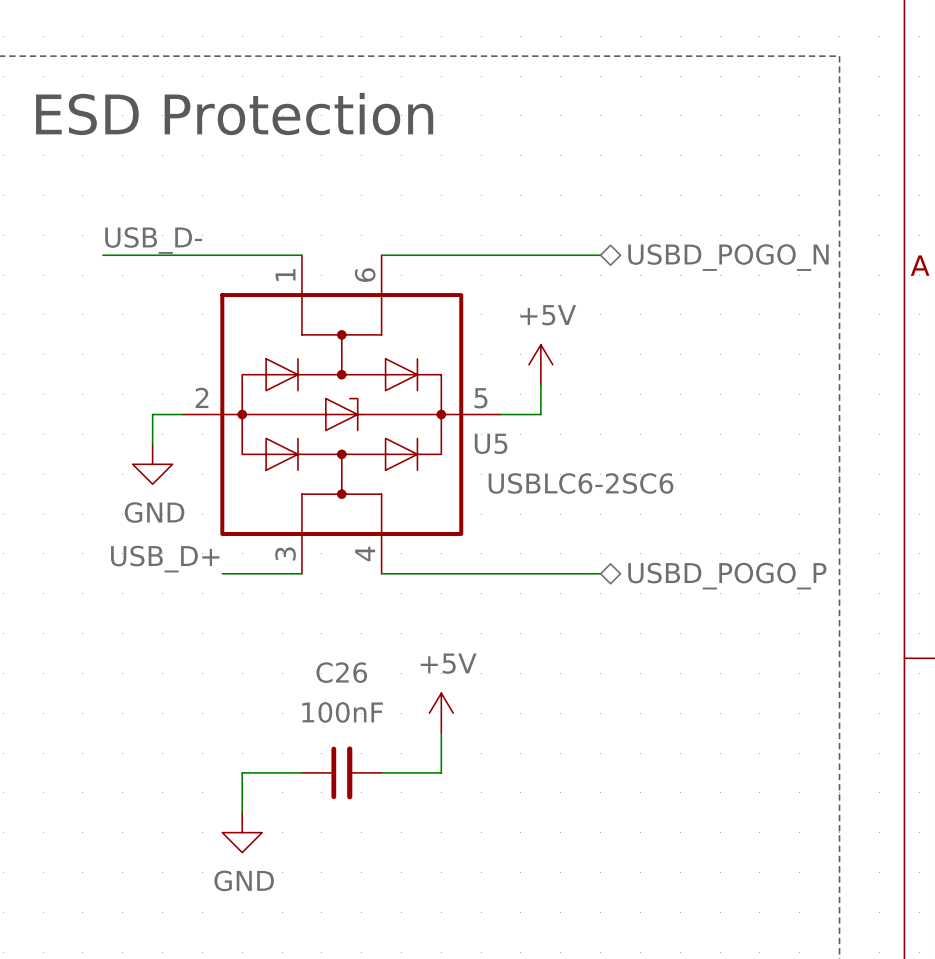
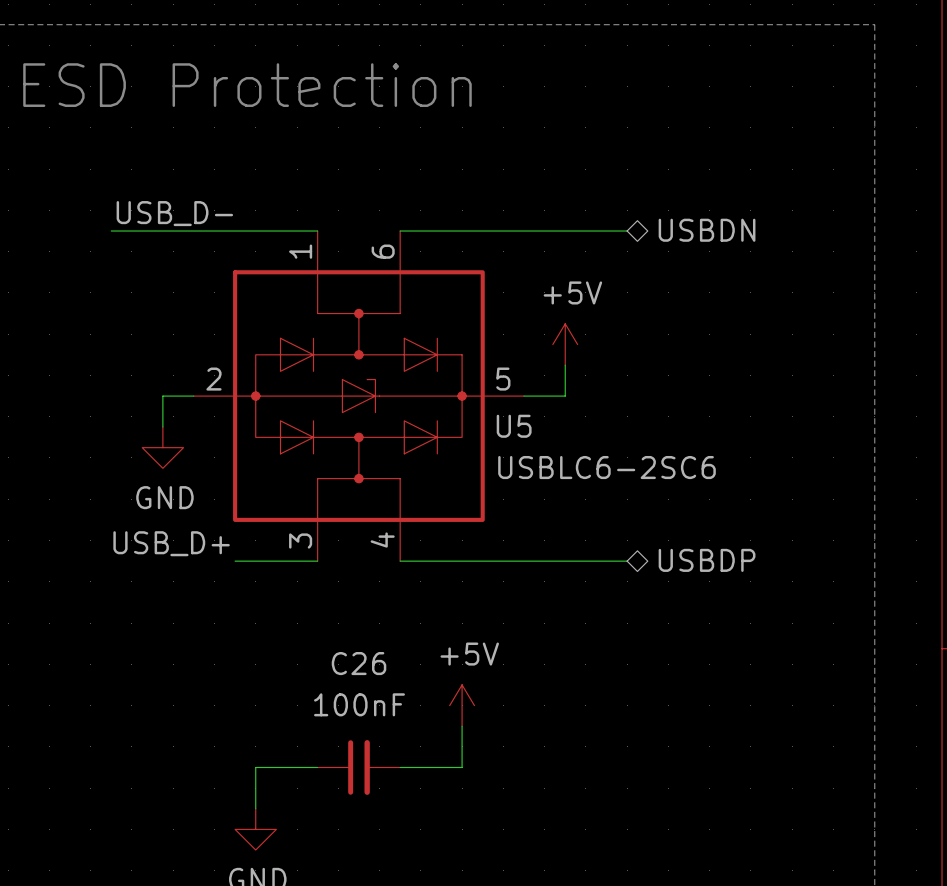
hierarchical label: USBD_POGO_N (728, 257) -> USBDN (707, 230)
hierarchical label: USBD_POGO_P (727, 576) -> USBDP (707, 560)

